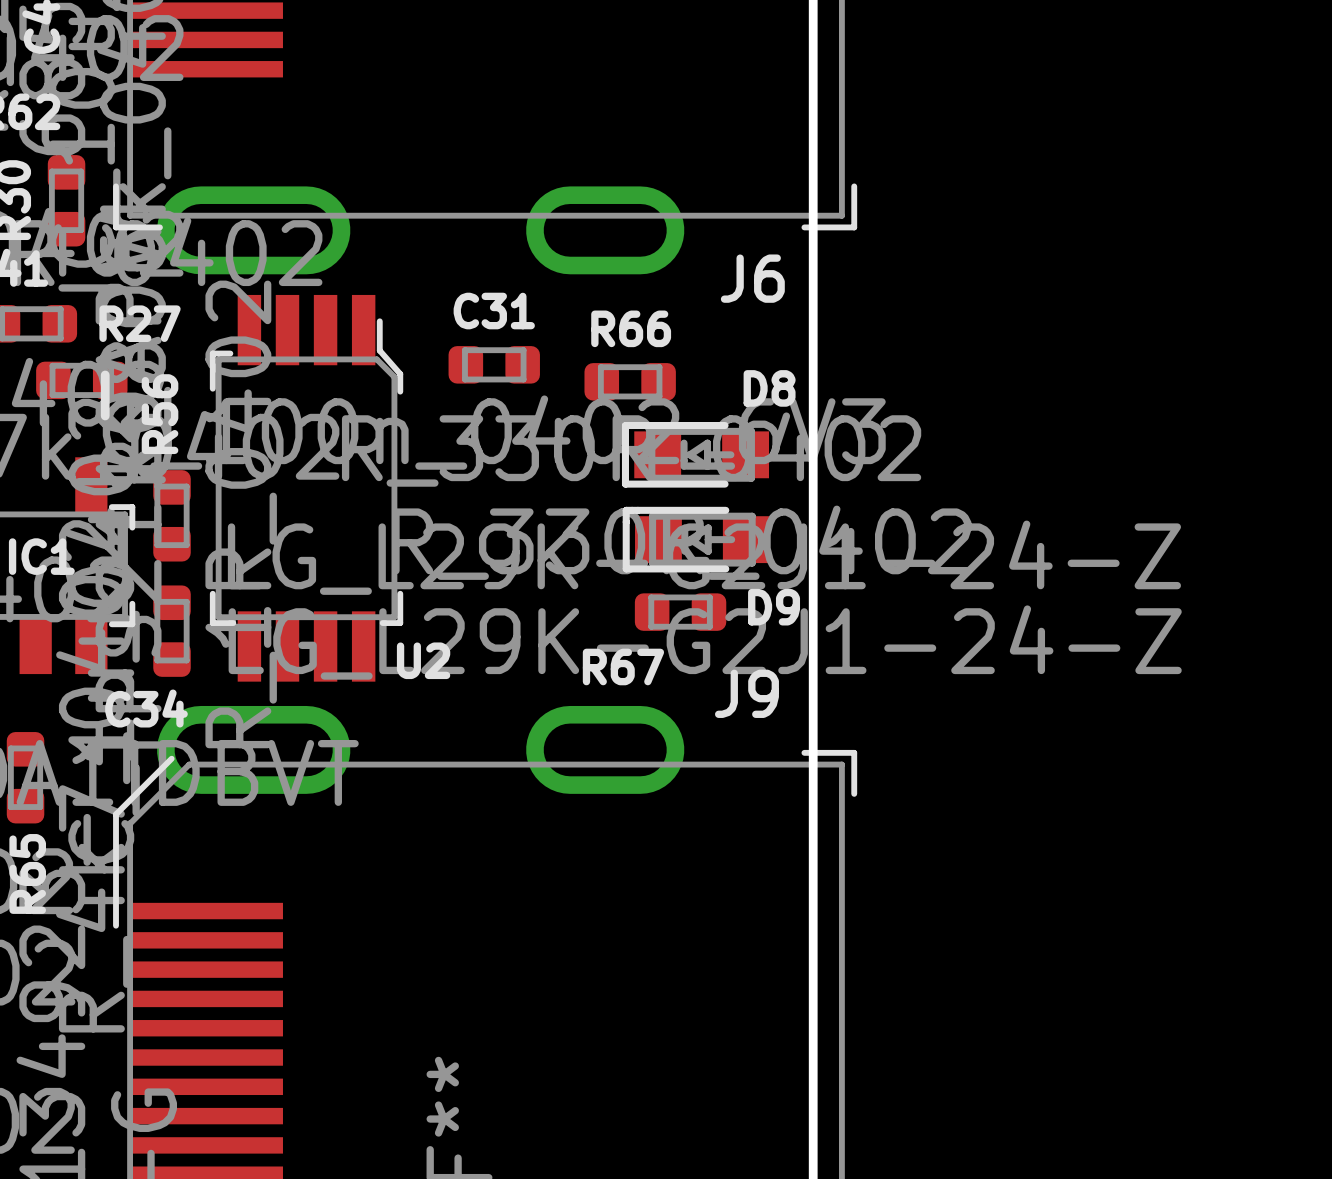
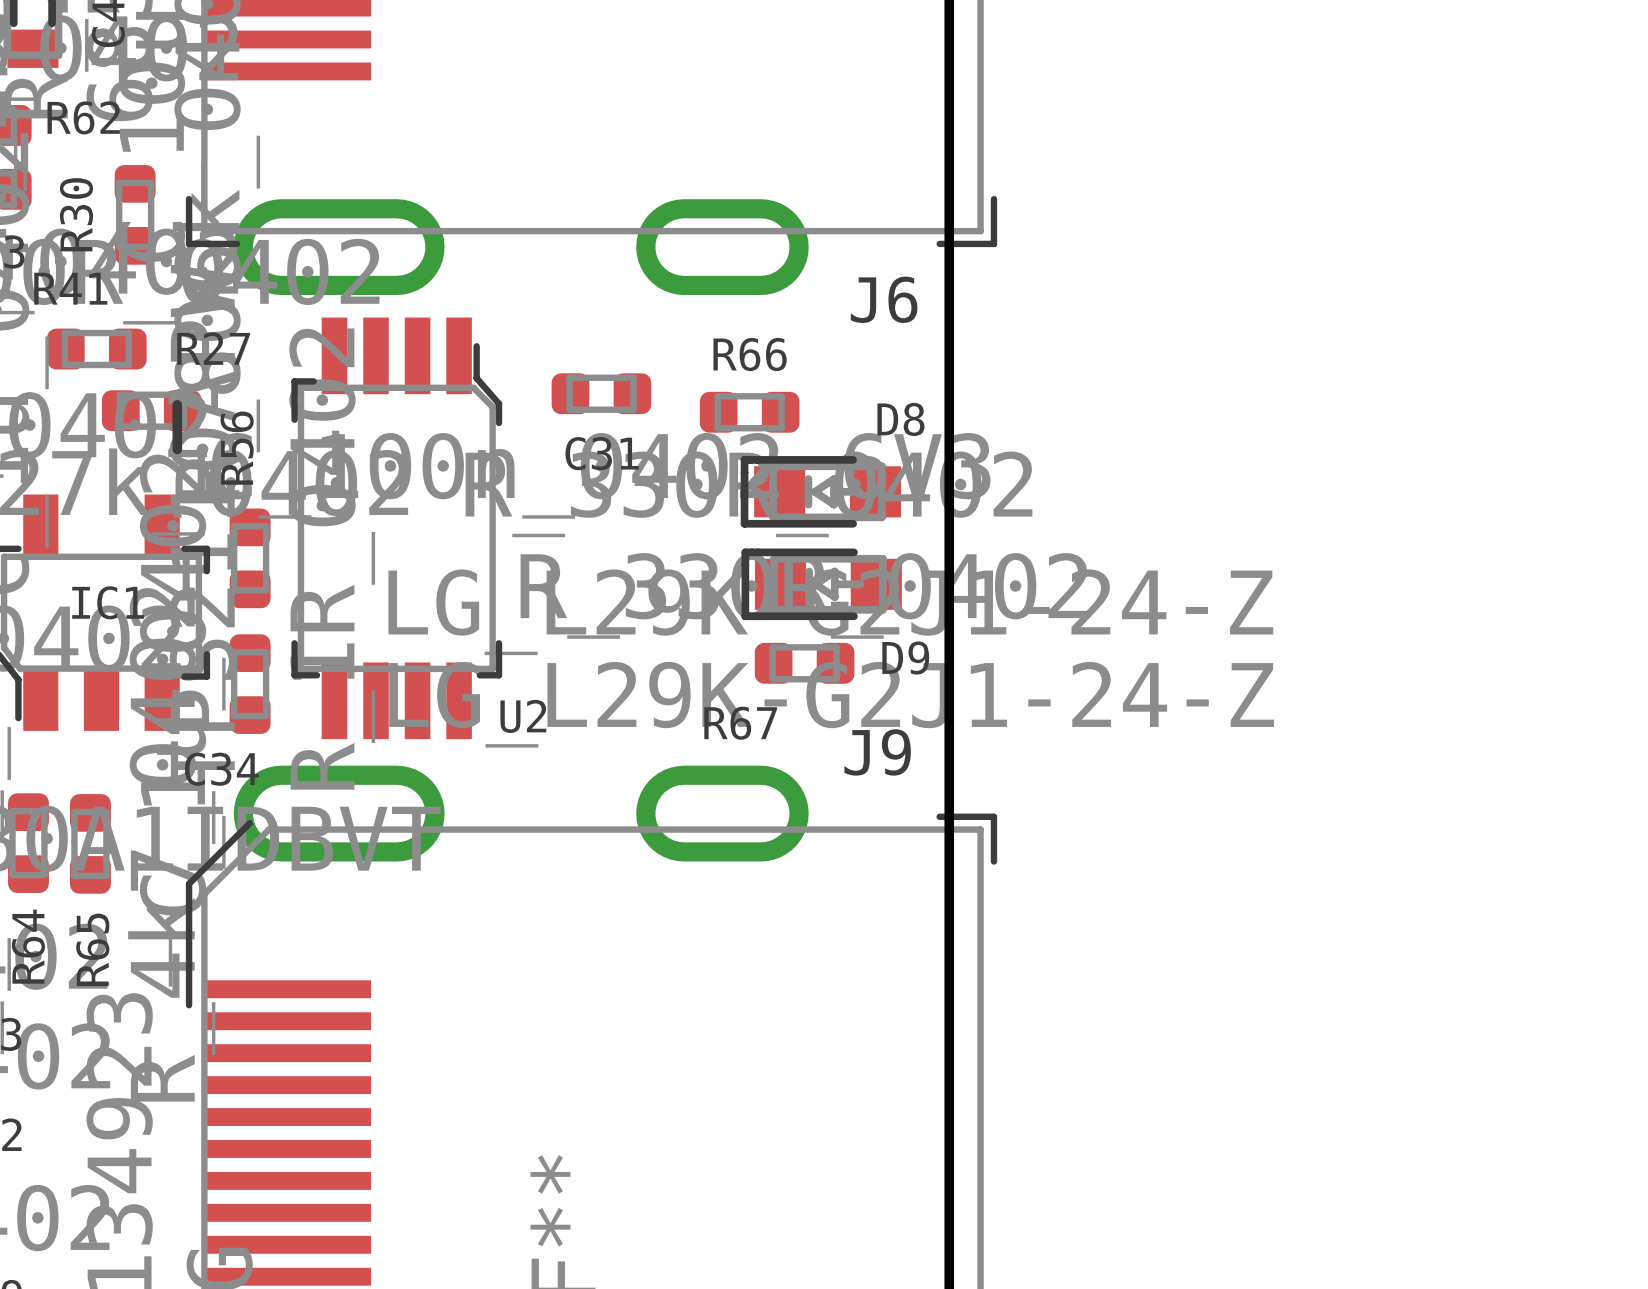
C31 name position: C31 (494, 311) -> C31 (602, 453)

